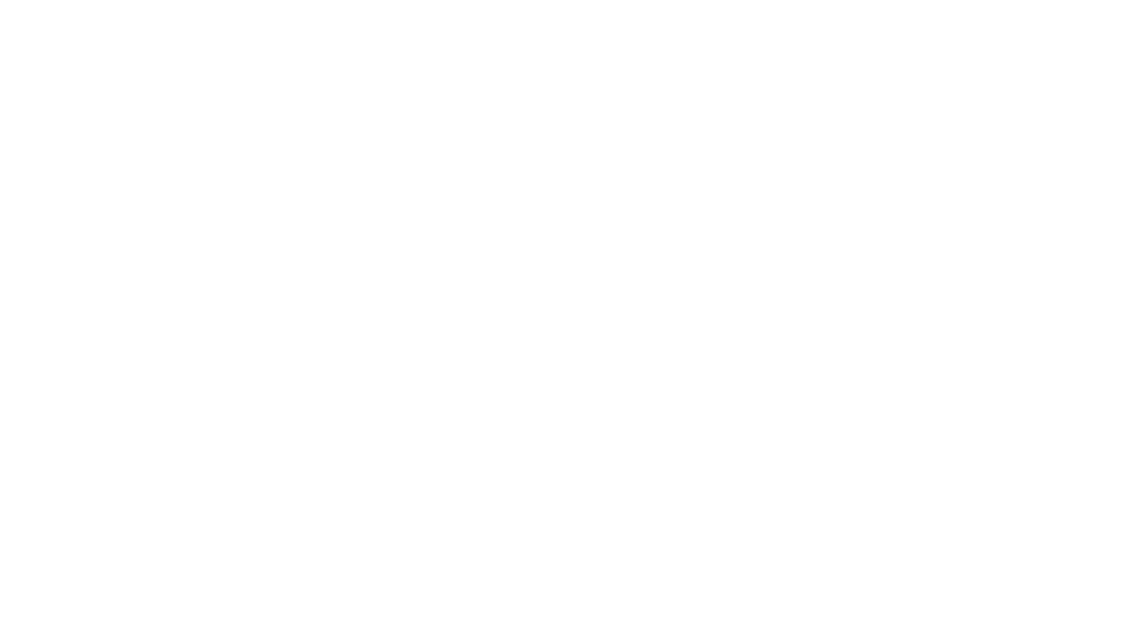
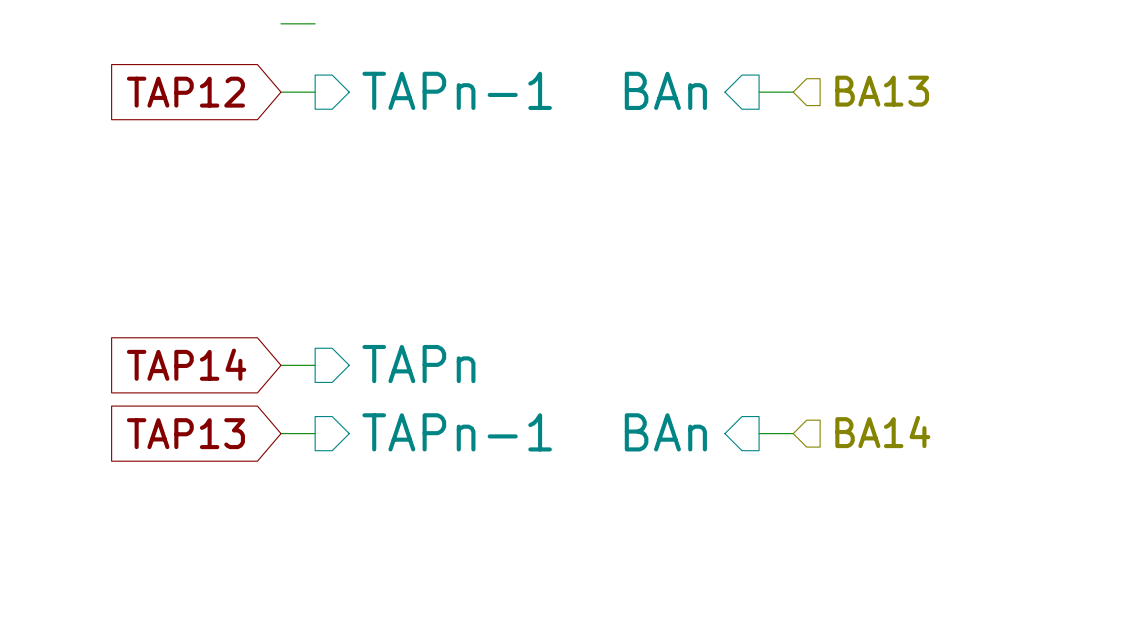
wire: none -> (280, 23) (315, 23)
sheet pin: none -> TAPn-1 (457, 90)
sheet pin: none -> BAn (665, 90)
hierarchical label: none -> BA13 (882, 91)
global label: none -> TAP12 (185, 92)
wire: none -> (280, 92) (315, 92)
wire: none -> (759, 92) (793, 92)
global label: none -> TAP14 (186, 364)
sheet pin: none -> TAPn (418, 364)
wire: none -> (280, 365) (315, 365)
hierarchical label: none -> BA14 (882, 431)
sheet pin: none -> TAPn-1 (457, 432)
sheet pin: none -> BAn (665, 432)
global label: none -> TAP13 (185, 433)
wire: none -> (280, 433) (315, 433)
wire: none -> (759, 433) (793, 433)

